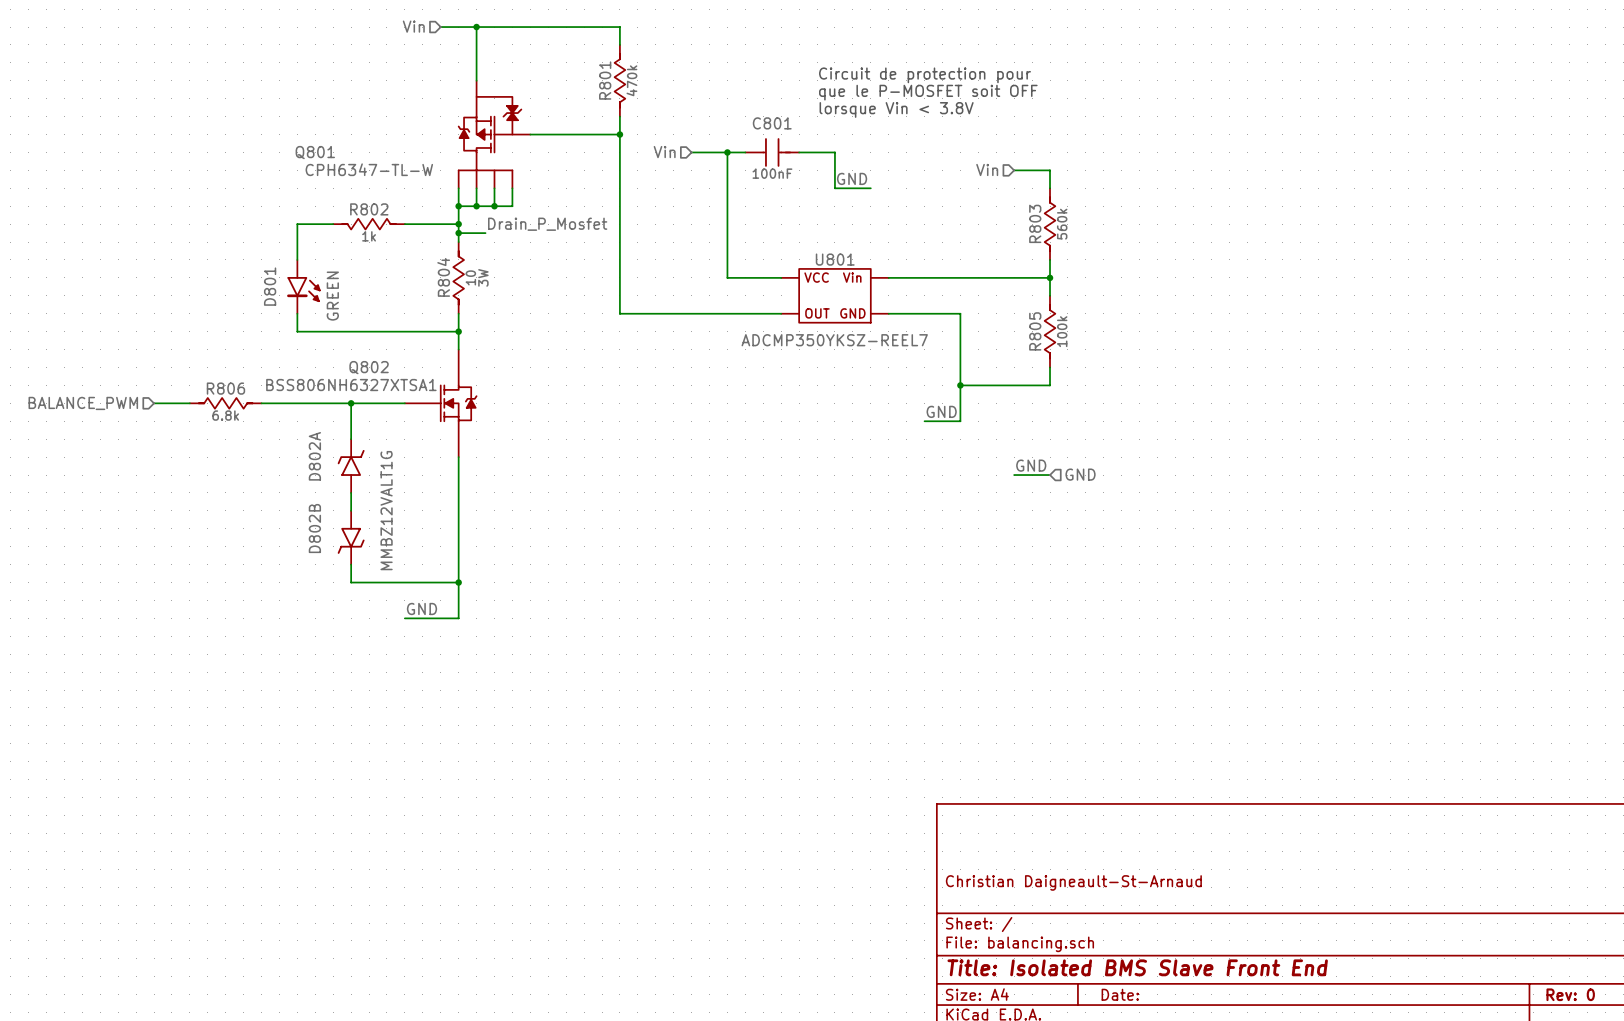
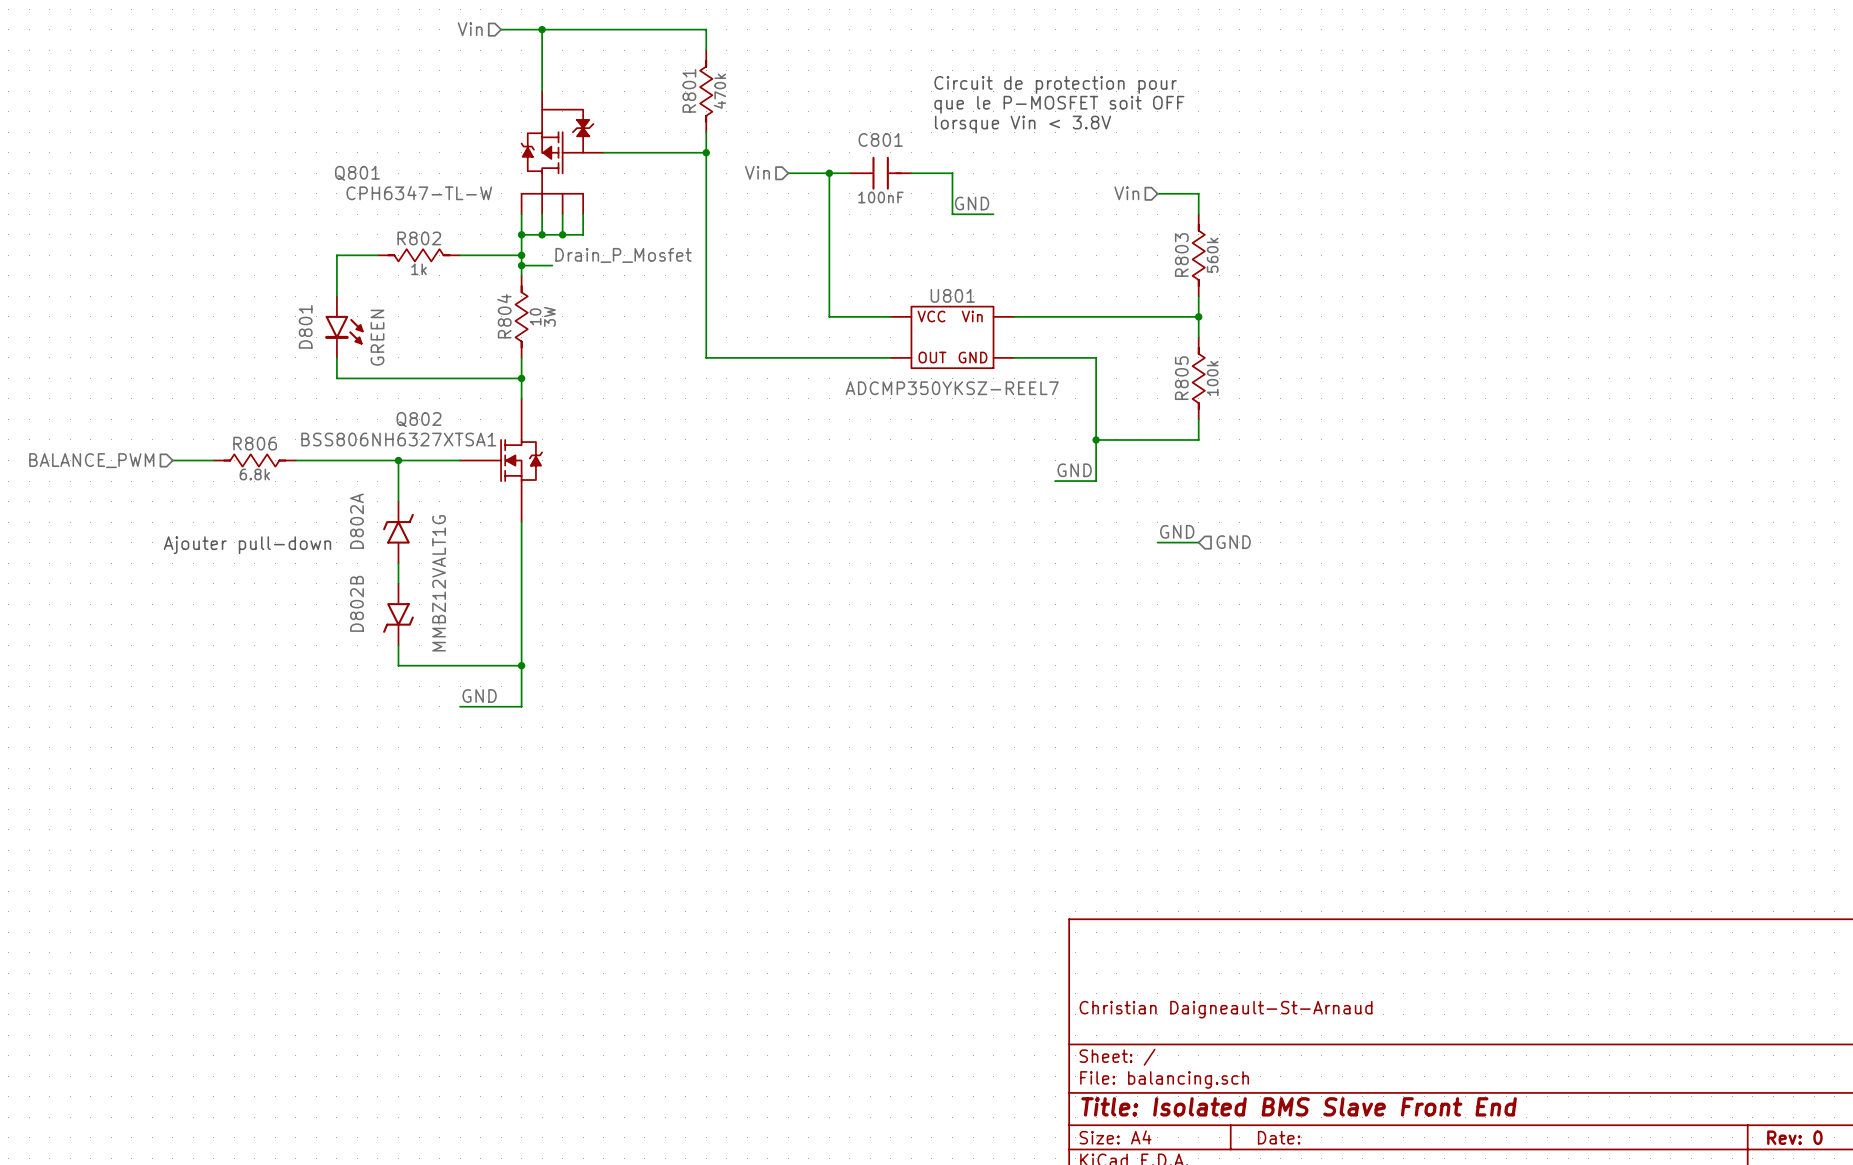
text: none -> Ajouter pull-down (247, 545)

